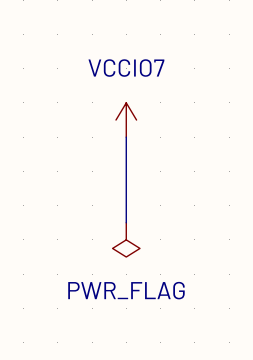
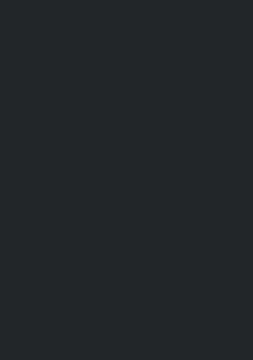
power symbol: VCCIO7 (126, 120) -> none
wire: (126, 137) (126, 222) -> none
power symbol: PWR_FLAG (126, 239) -> none

